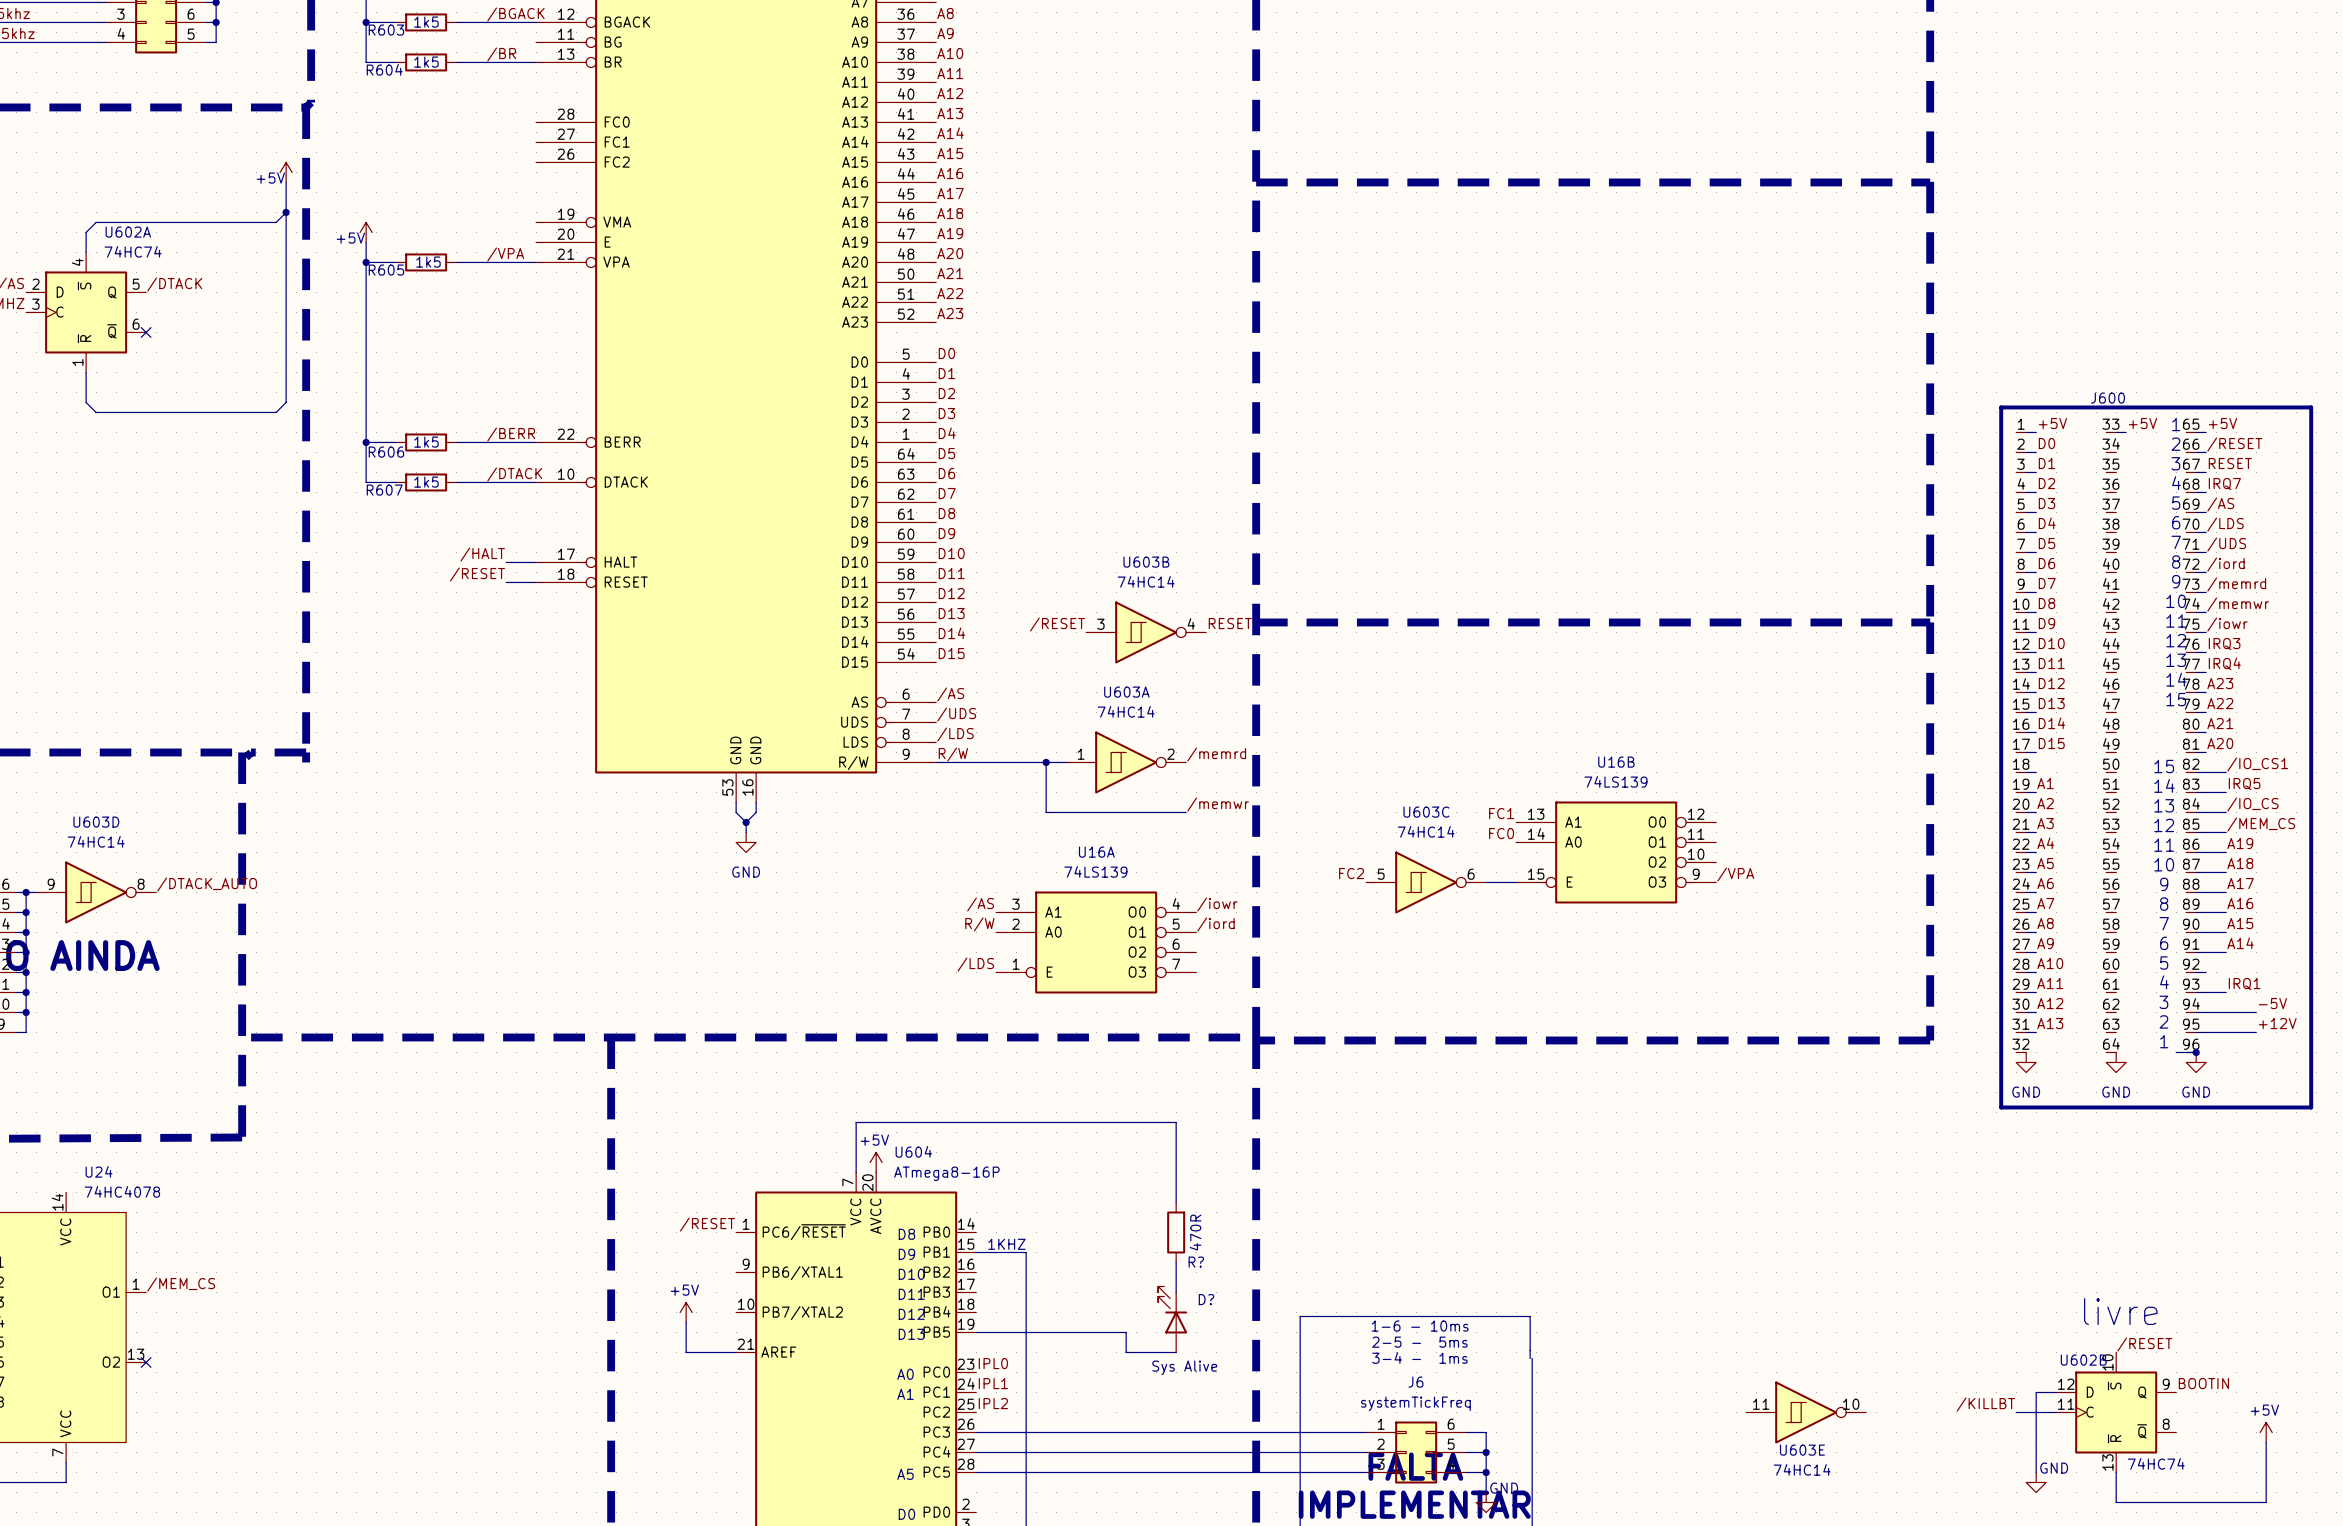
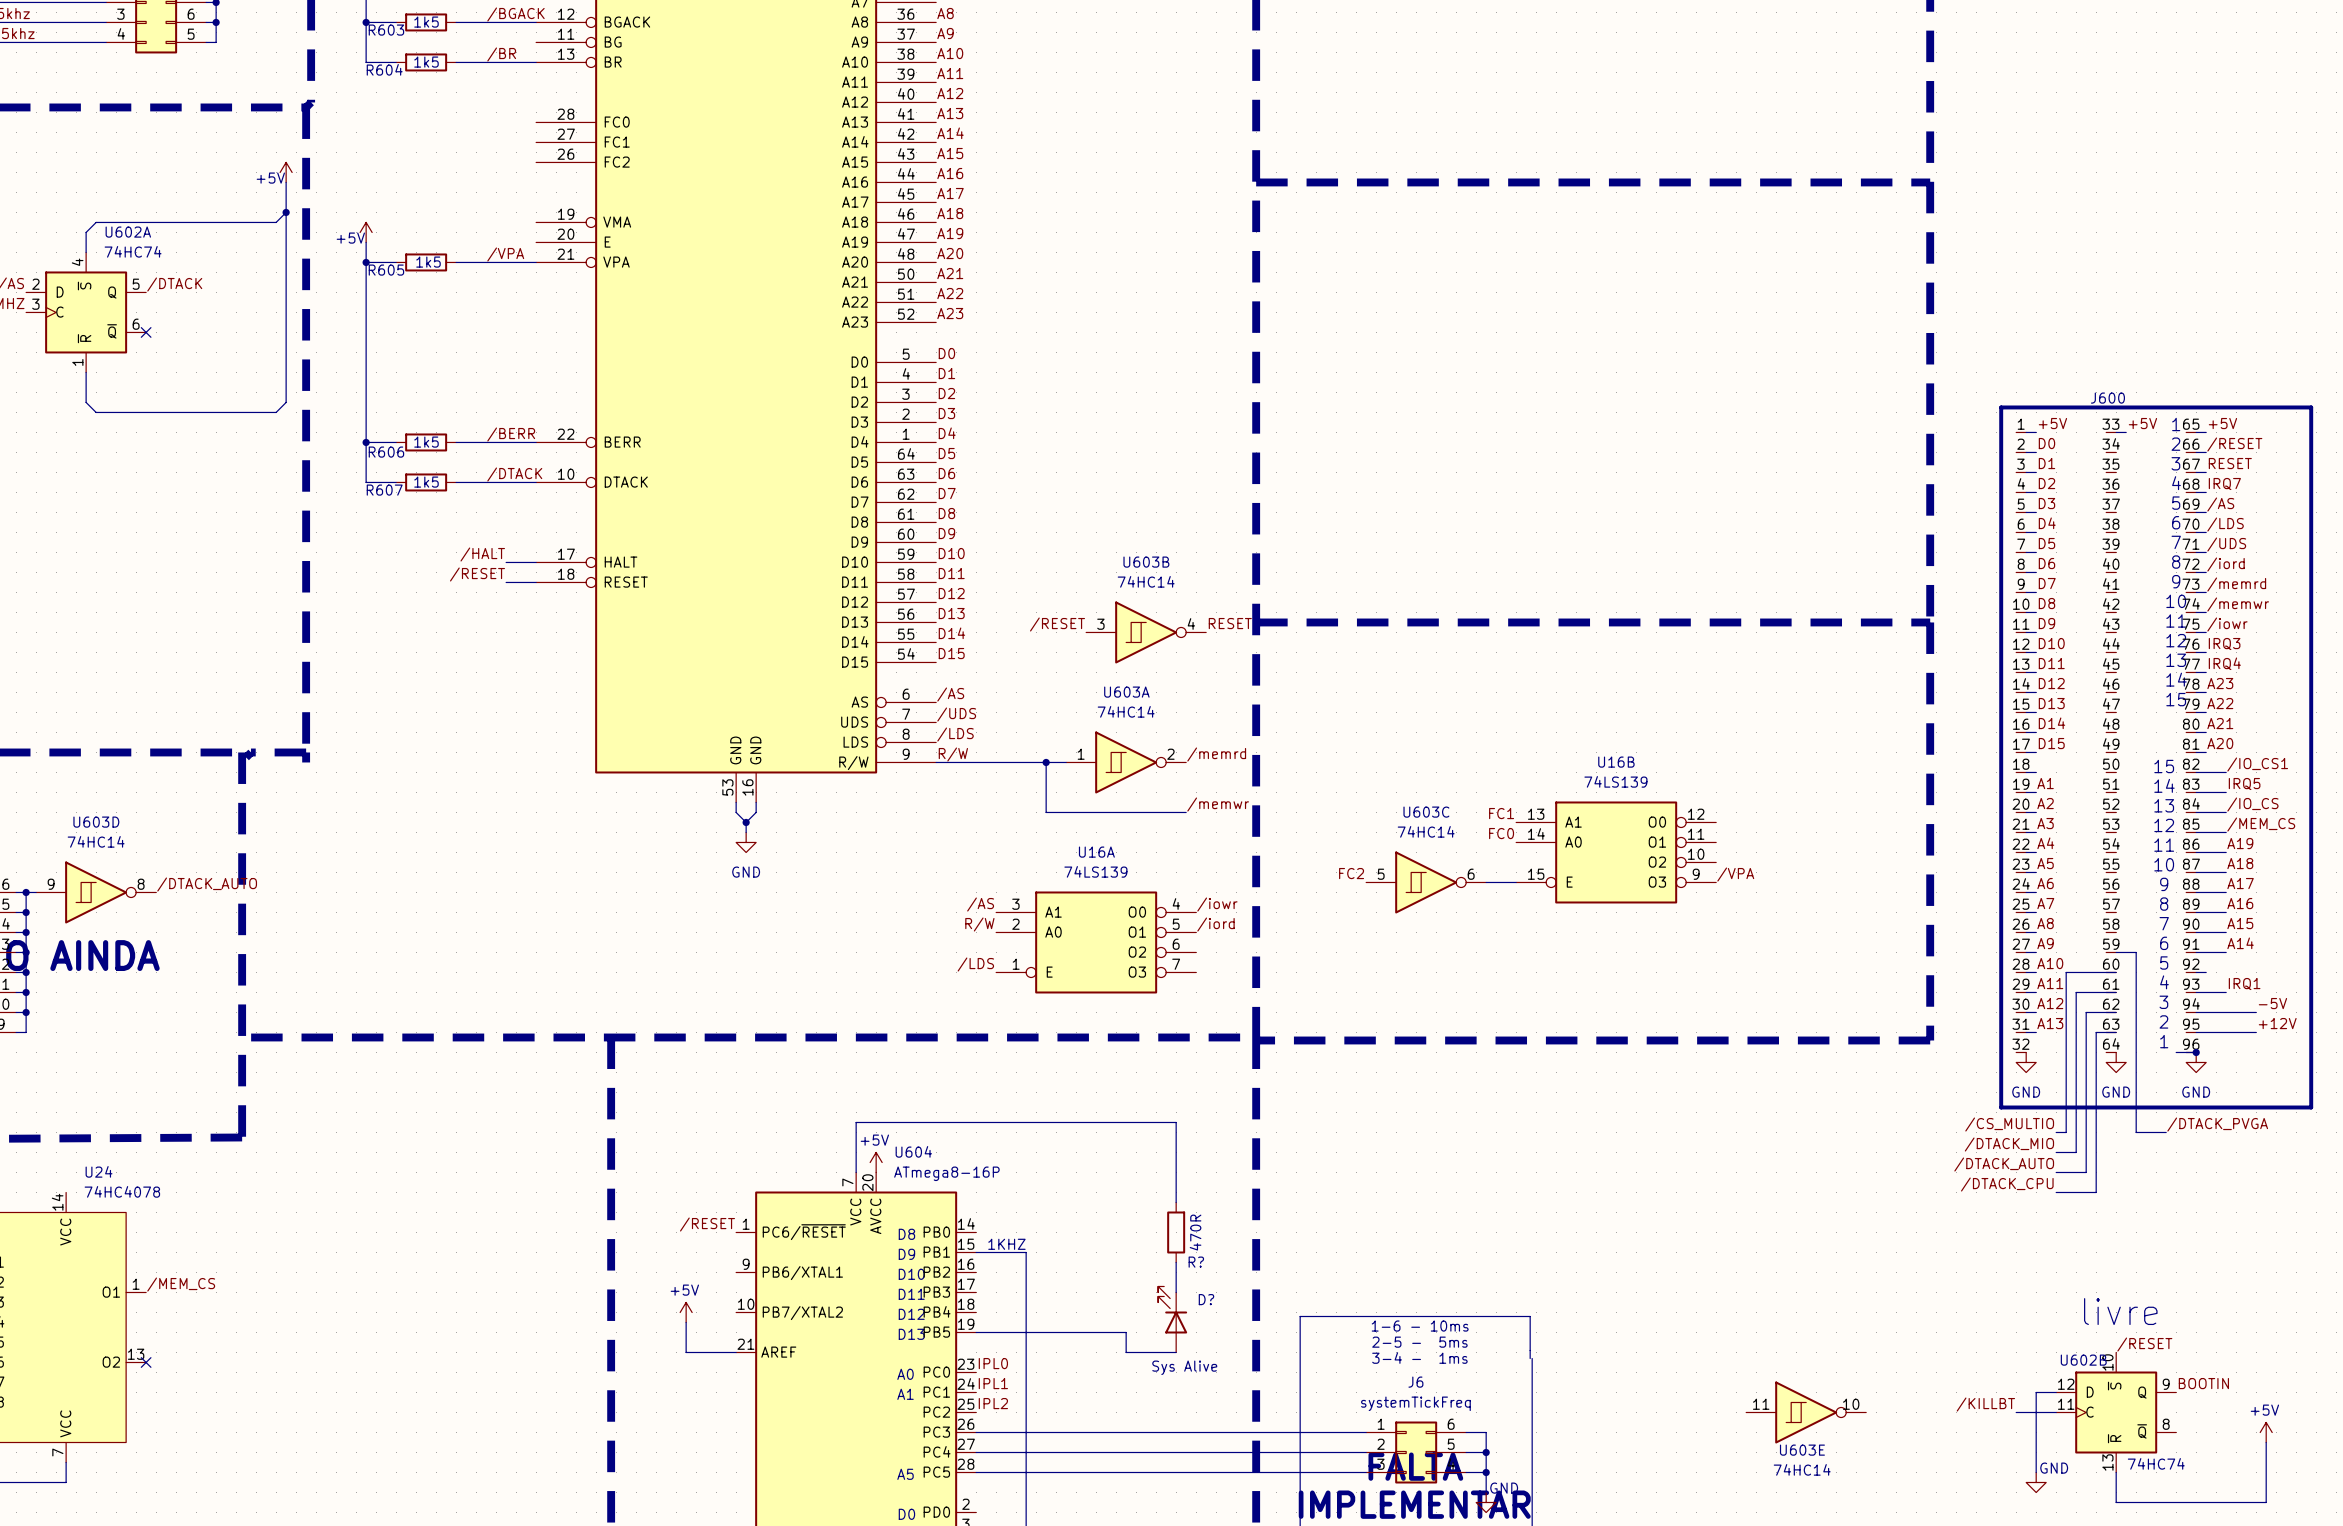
wire: none -> (2116, 952) (2136, 952) (2136, 1132) (2166, 1132)
wire: none -> (2116, 972) (2066, 972) (2066, 1132) (2056, 1132)
wire: none -> (2116, 992) (2076, 992) (2076, 1152) (2056, 1152)
wire: none -> (2116, 1012) (2086, 1012) (2086, 1172) (2056, 1172)
wire: none -> (2116, 1032) (2096, 1032) (2096, 1192) (2056, 1192)
label: none -> /CS_MULTIO (2009, 1124)
label: none -> /DTACK_PVGA (2217, 1124)
label: none -> /DTACK_MIO (2009, 1144)
label: none -> /DTACK_AUTO (2004, 1164)
label: none -> /DTACK_CPU (2007, 1184)

